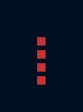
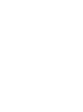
part: (41, 47) -> none
part: (41, 73) -> none

